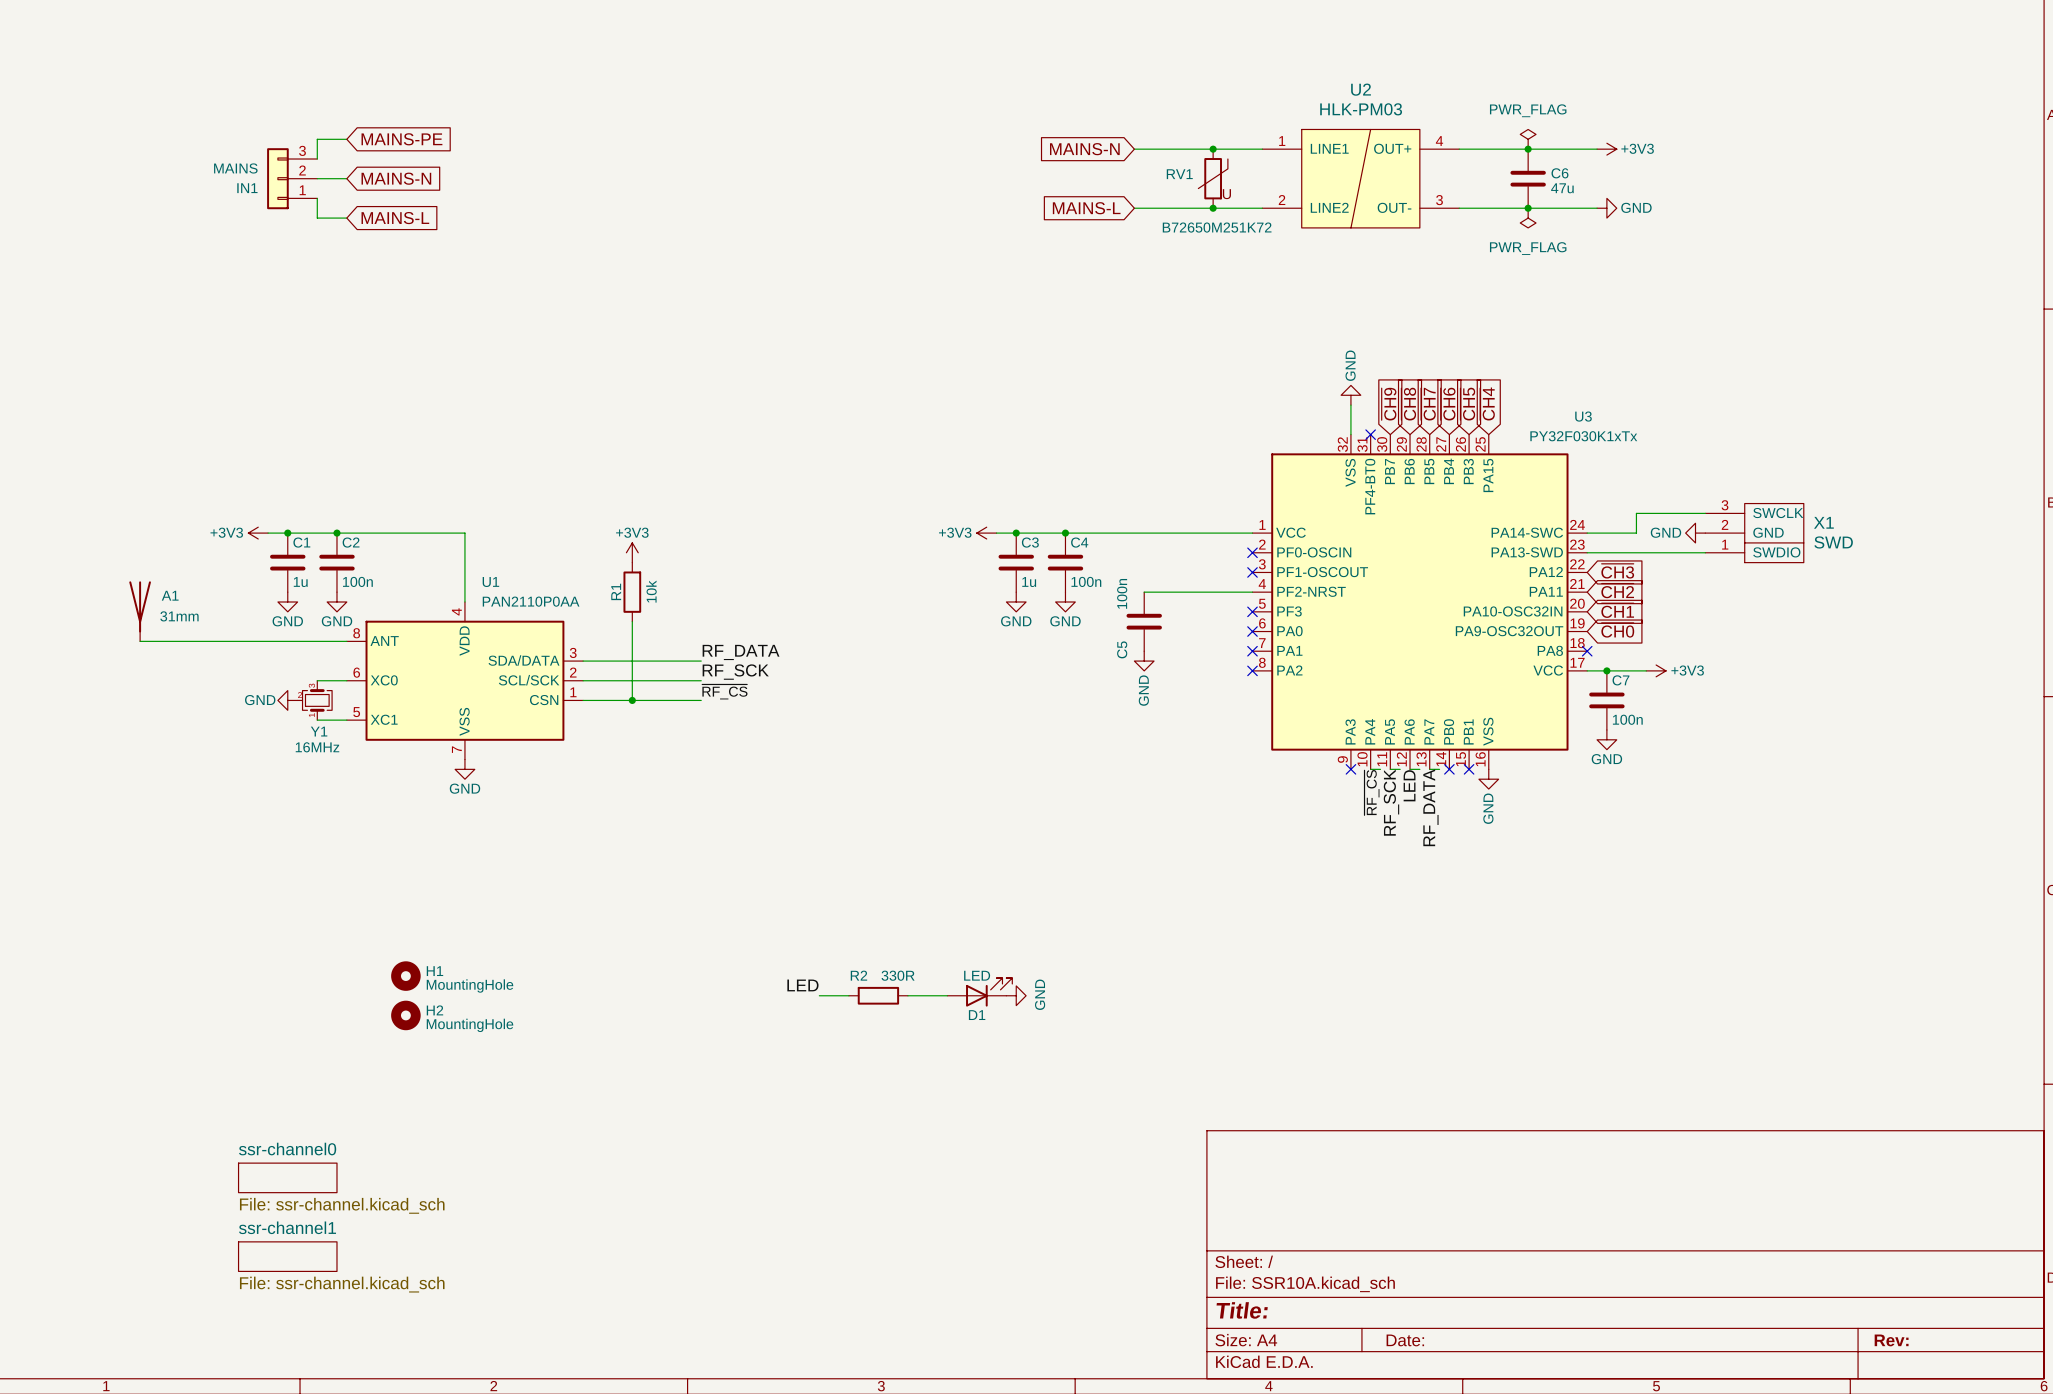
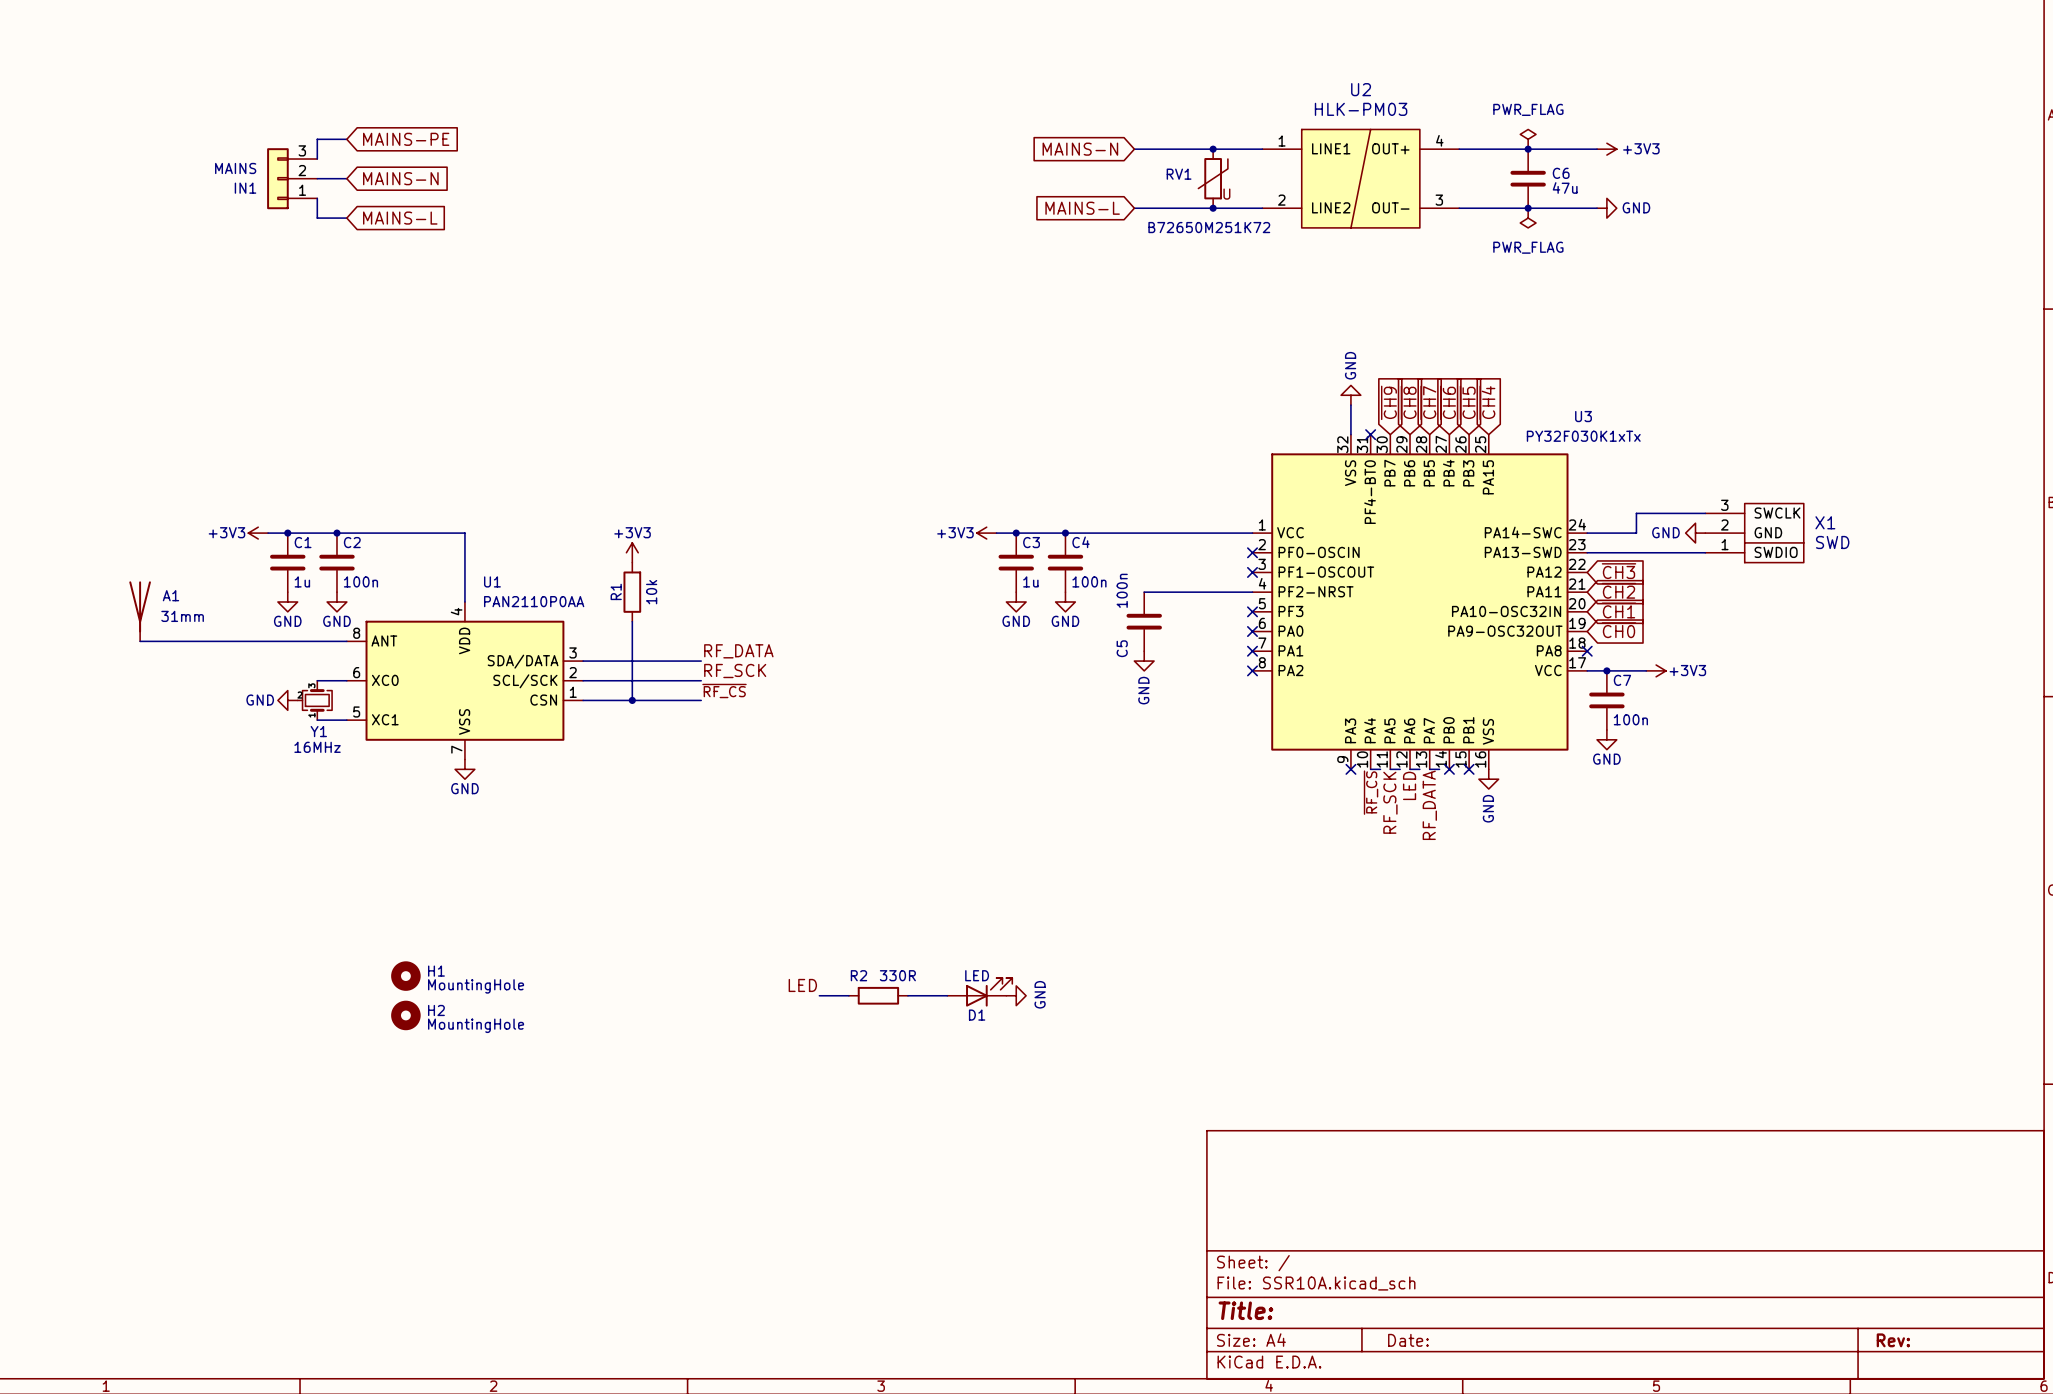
sheet ssr-channel0: File: ssr-channel.kicad_sch (287, 1177) -> none
sheet ssr-channel1: File: ssr-channel.kicad_sch (287, 1256) -> none

